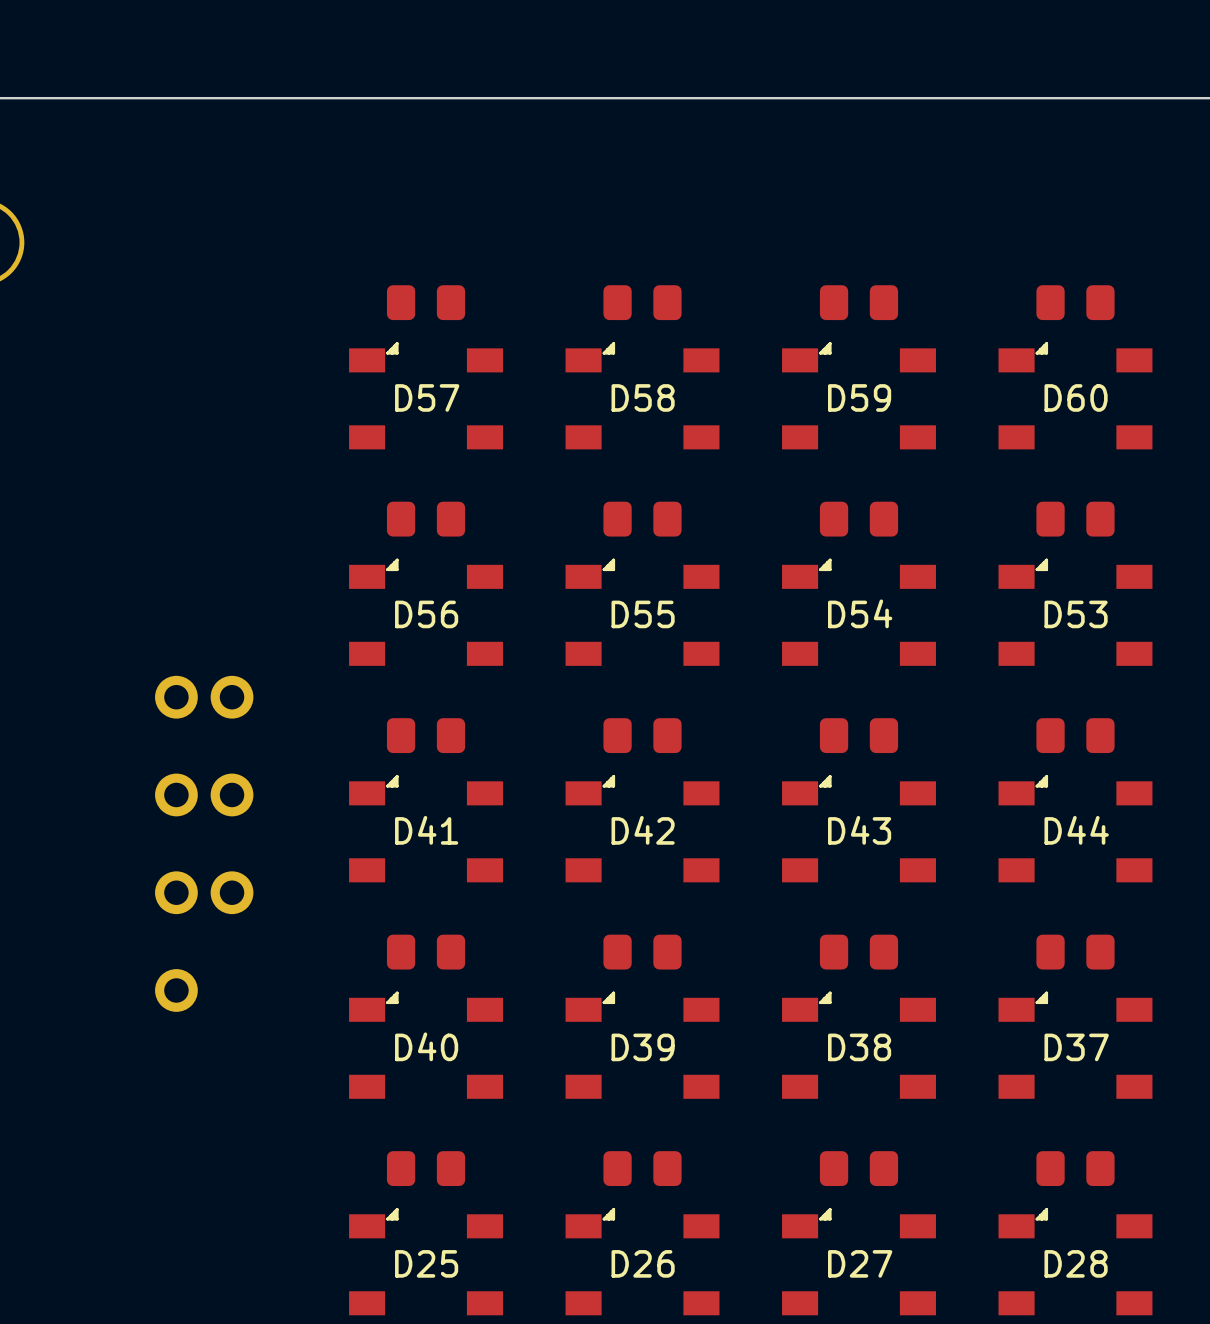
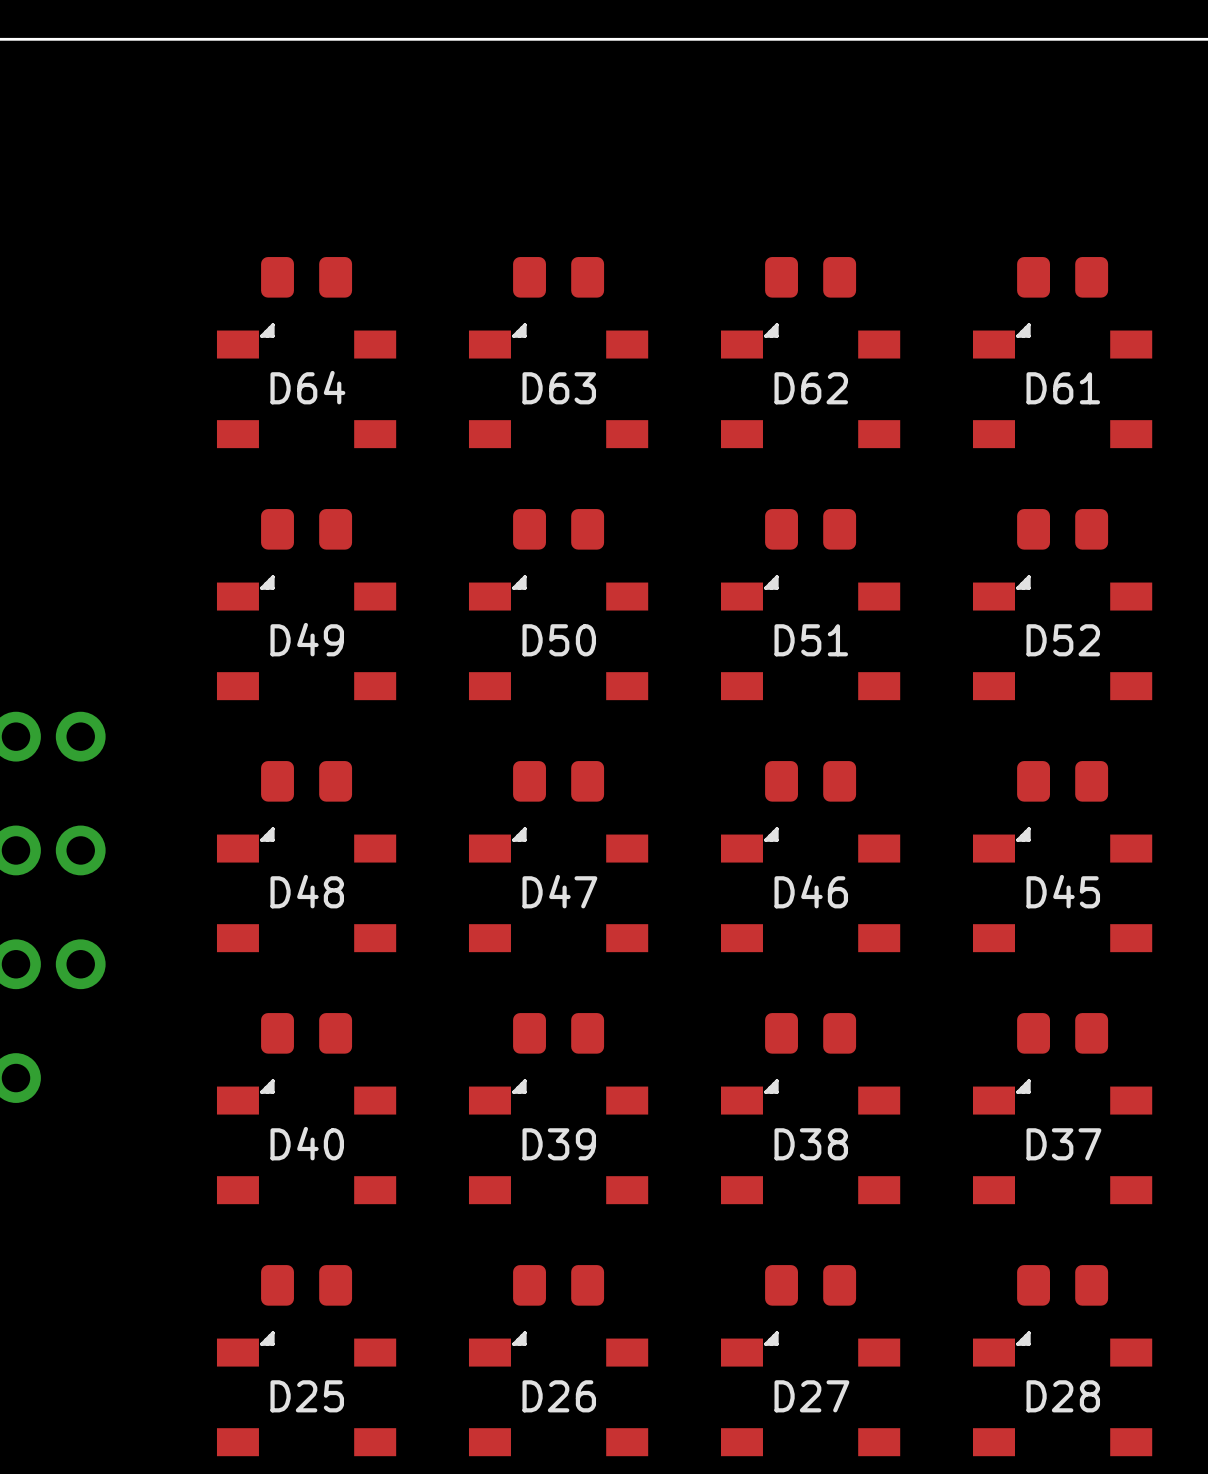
D57 name: D57 (427, 397) -> D64 (307, 387)
D58 name: D58 (643, 397) -> D63 (559, 388)
D59 name: D59 (859, 397) -> D62 (811, 388)
D60 name: D60 (1076, 397) -> D61 (1063, 388)
D54 name: D54 (860, 613) -> D51 (811, 640)
D56 name: D56 (426, 614) -> D49 (307, 639)
D55 name: D55 (643, 614) -> D50 (559, 640)
D53 name: D53 (1076, 614) -> D52 (1063, 640)
D41 name: D41 (426, 830) -> D48 (307, 891)
D42 name: D42 (643, 830) -> D47 (559, 891)
D43 name: D43 (859, 830) -> D46 (811, 891)
D44 name: D44 (1076, 830) -> D45 (1063, 891)

